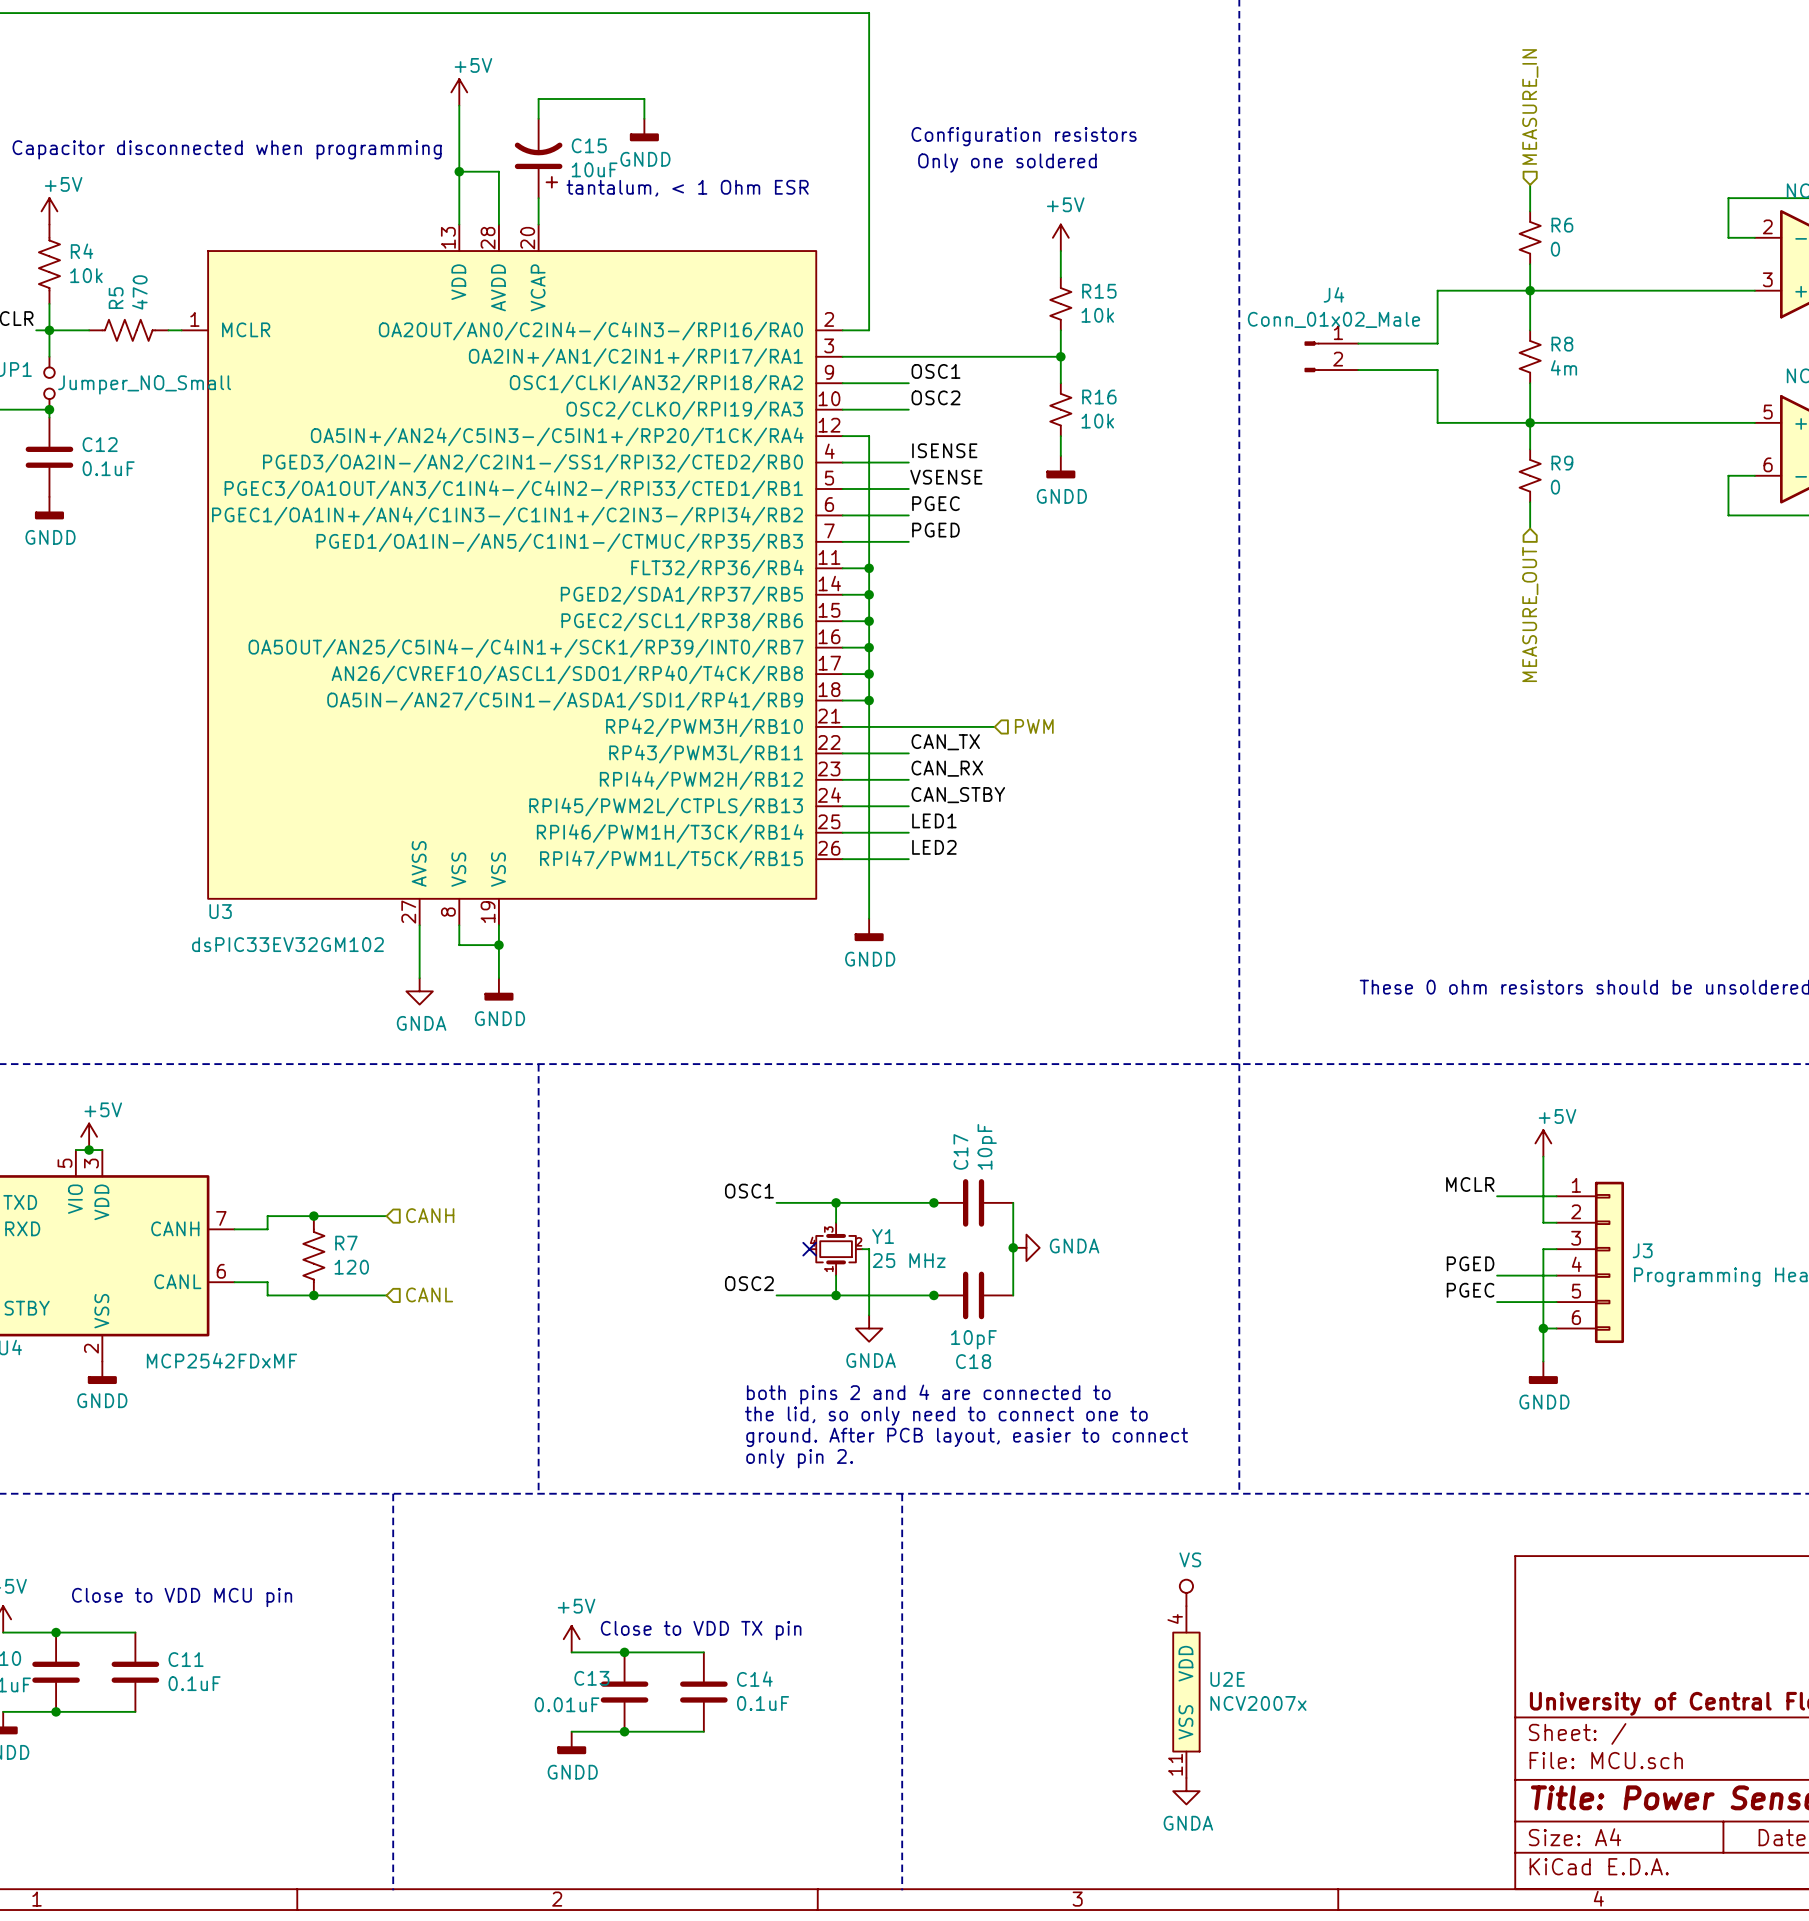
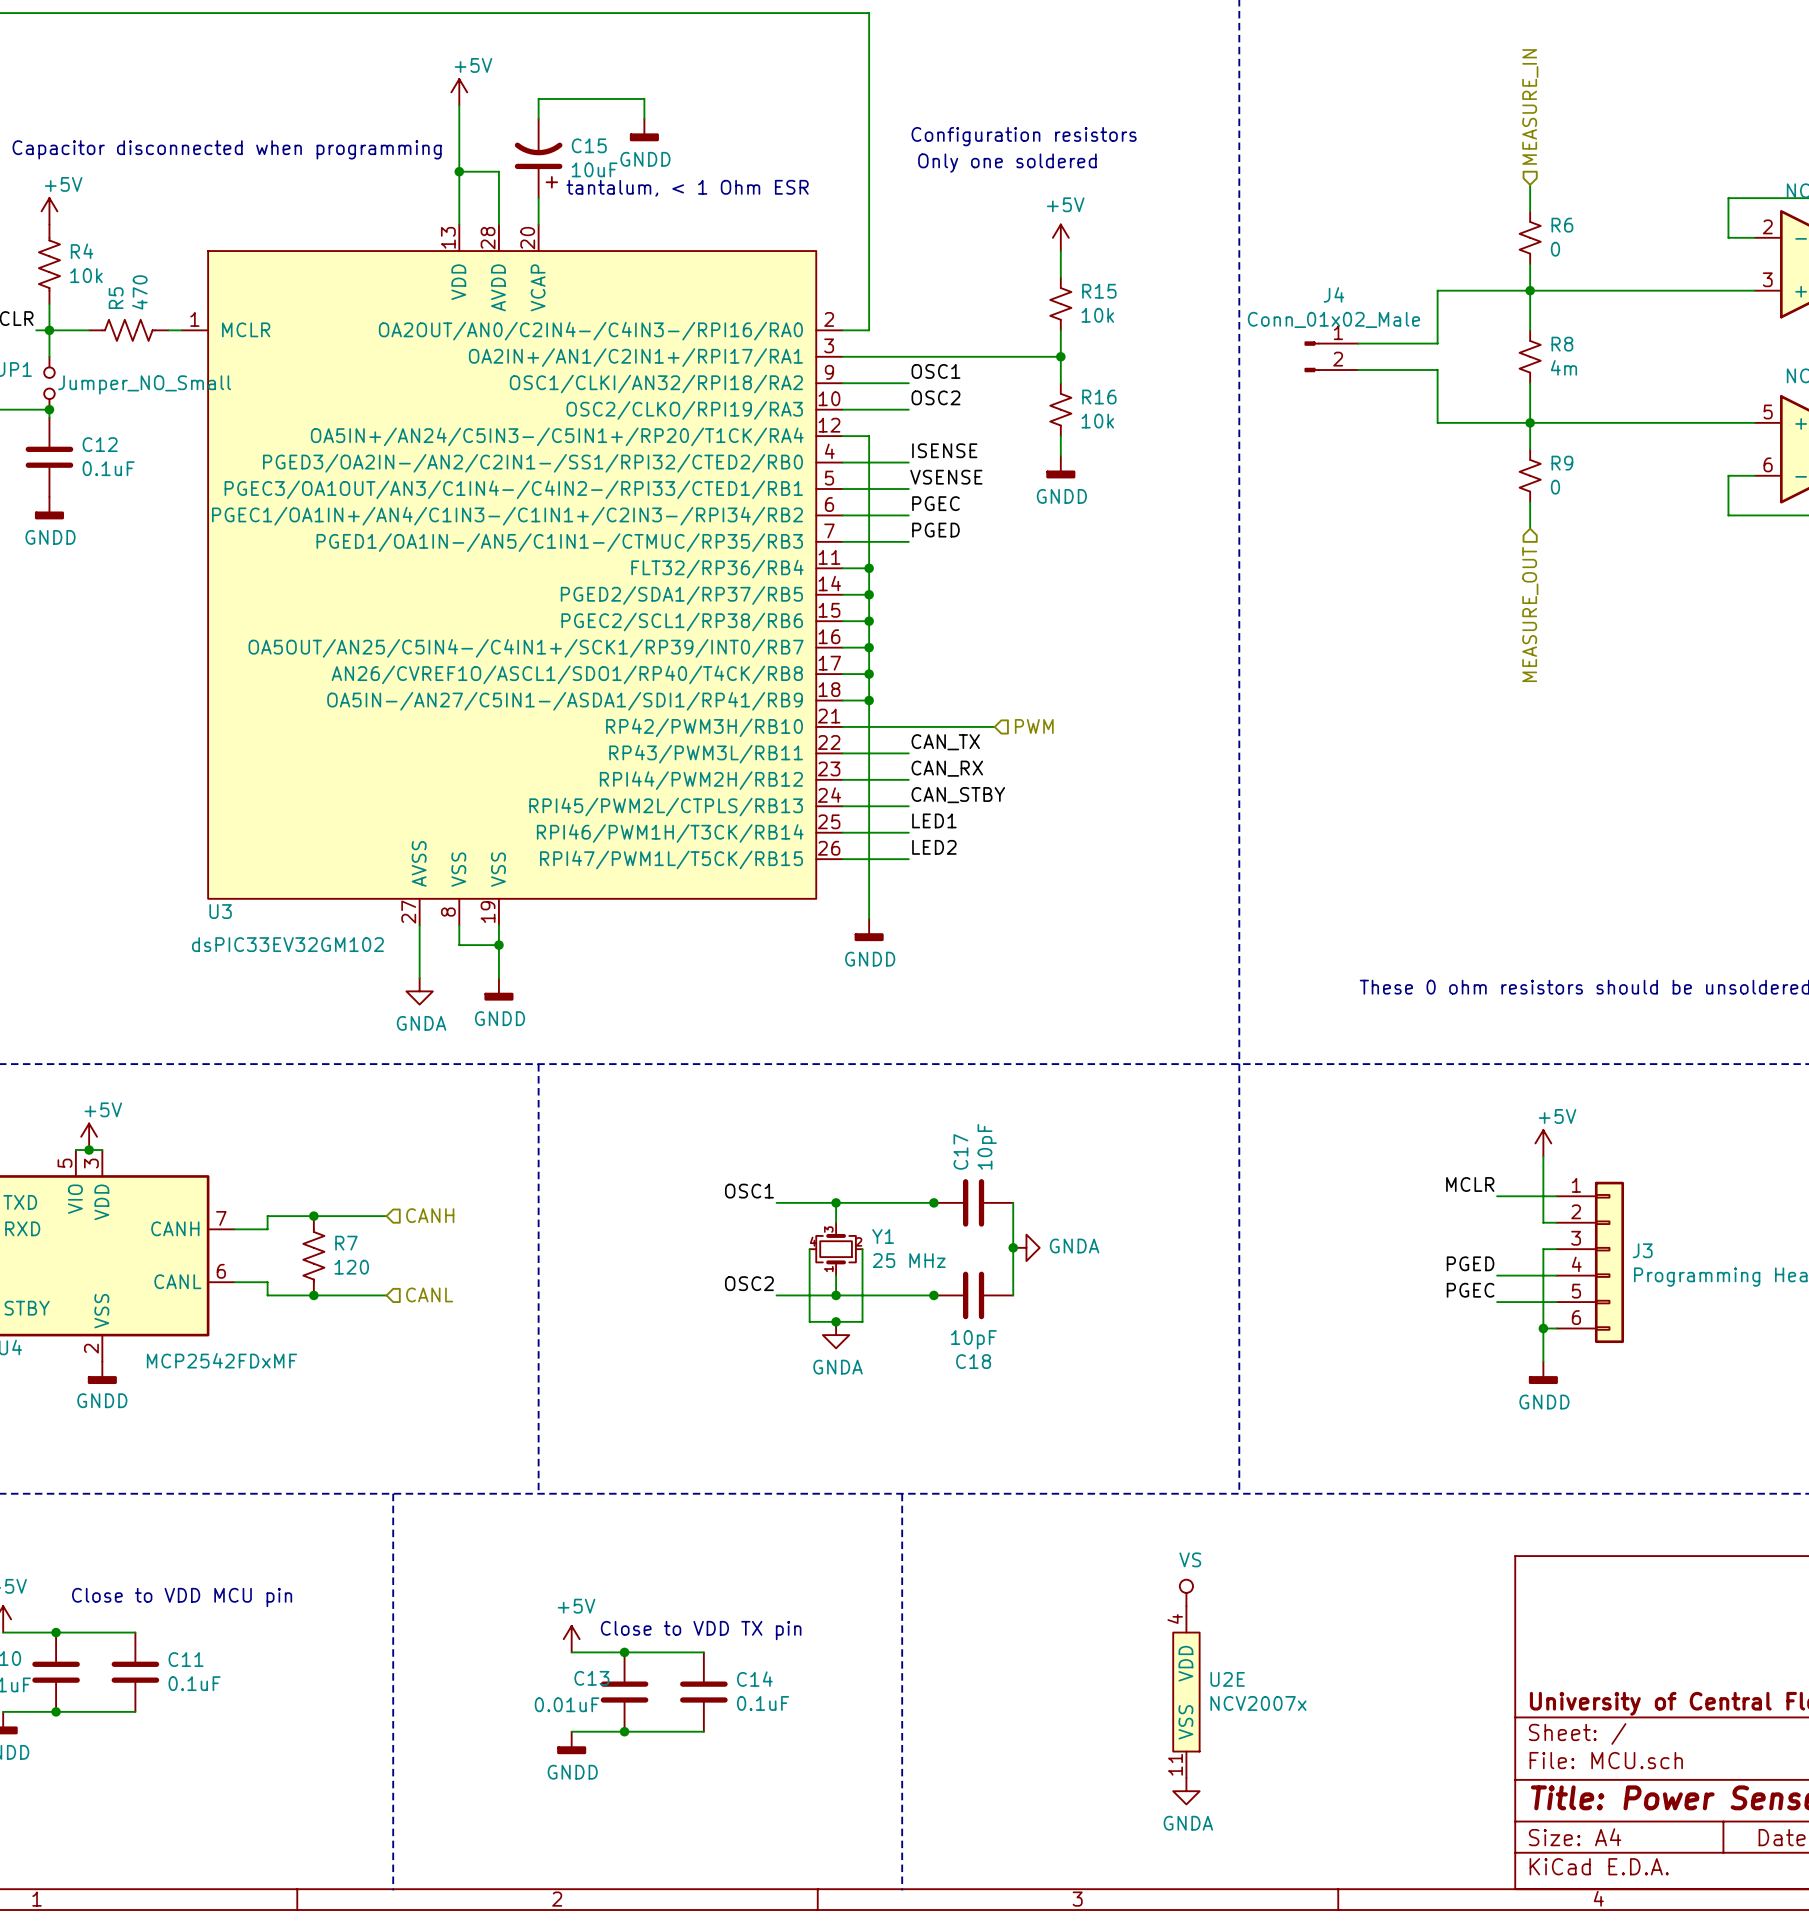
no-connect mark: (809, 1249) -> none
wire: (862, 1249) (869, 1249) (869, 1315) -> (862, 1249) (862, 1321) (809, 1321) (809, 1249)
junction: none -> (836, 1321)
power symbol position: GNDA (869, 1328) -> GNDA (836, 1335)
text: both pins 2 and 4 are connected to (928, 1394) -> none
text: the lid, so only need to connect one to (946, 1416) -> none
text: ground. After PCB layout, easier to connect (967, 1437) -> none
text: only pin 2. (799, 1458) -> none

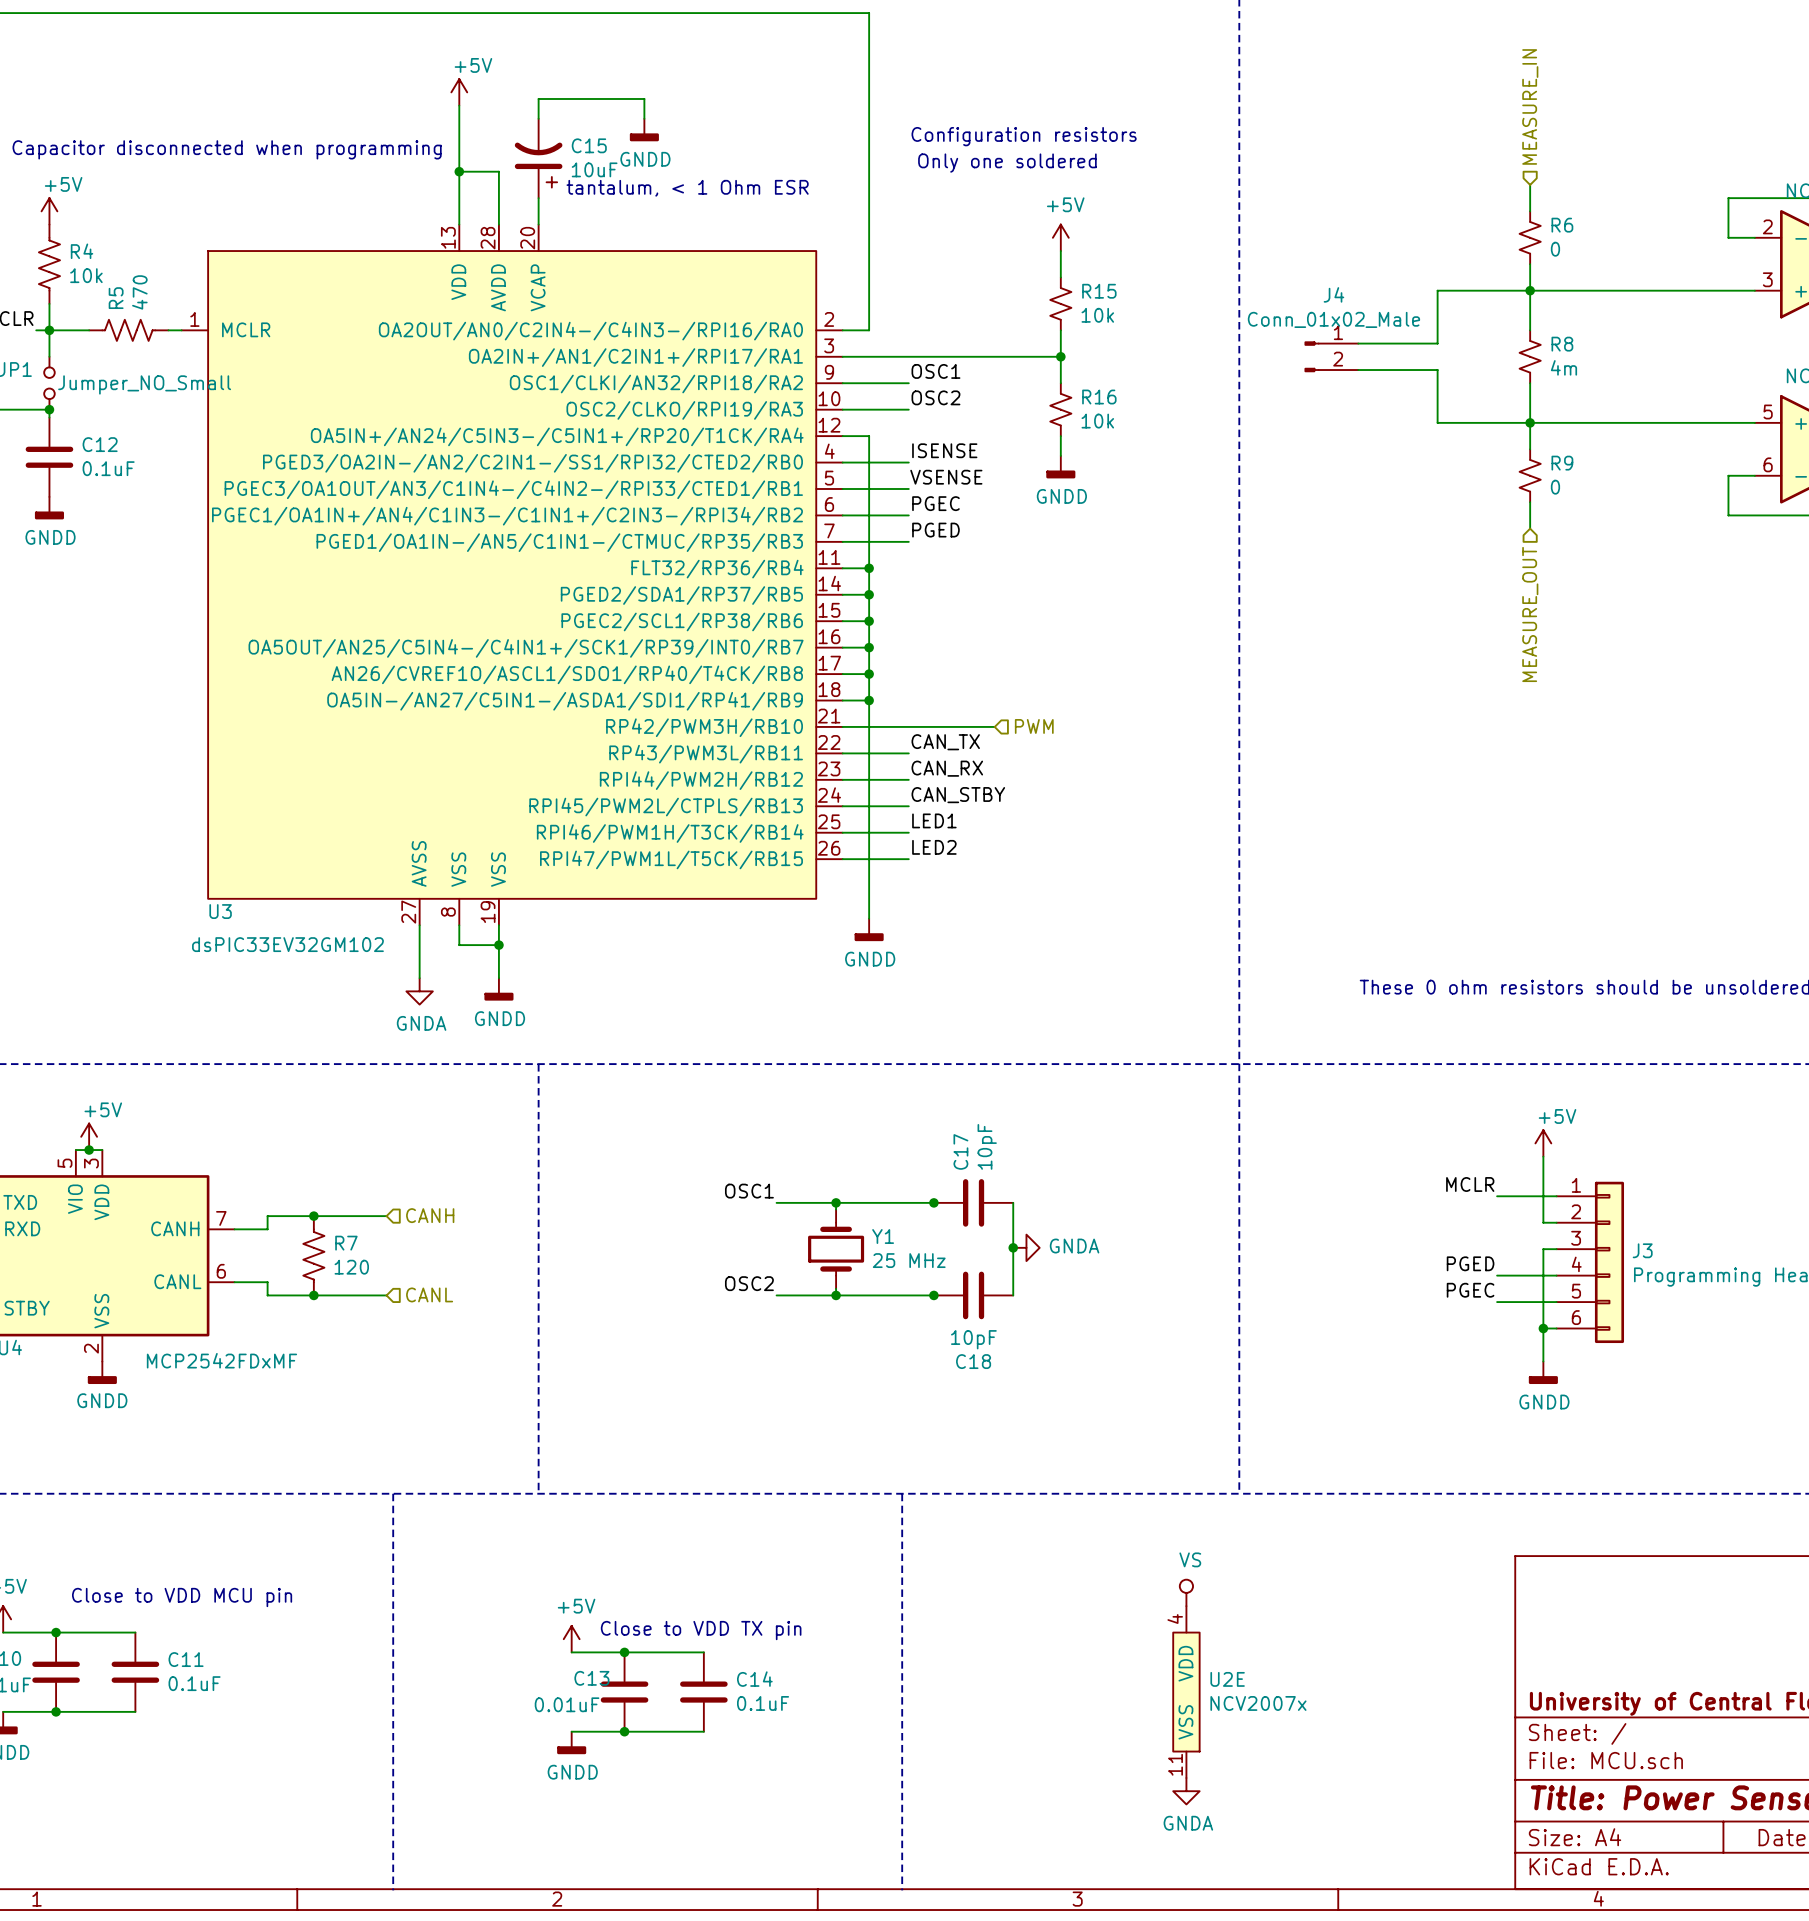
Y1 symbol: [809, 1222, 863, 1276] -> [808, 1209, 865, 1289]
wire: (809, 1249) (809, 1321) (862, 1321) (862, 1249) -> none
junction: (836, 1321) -> none
power symbol: GNDA (836, 1335) -> none

